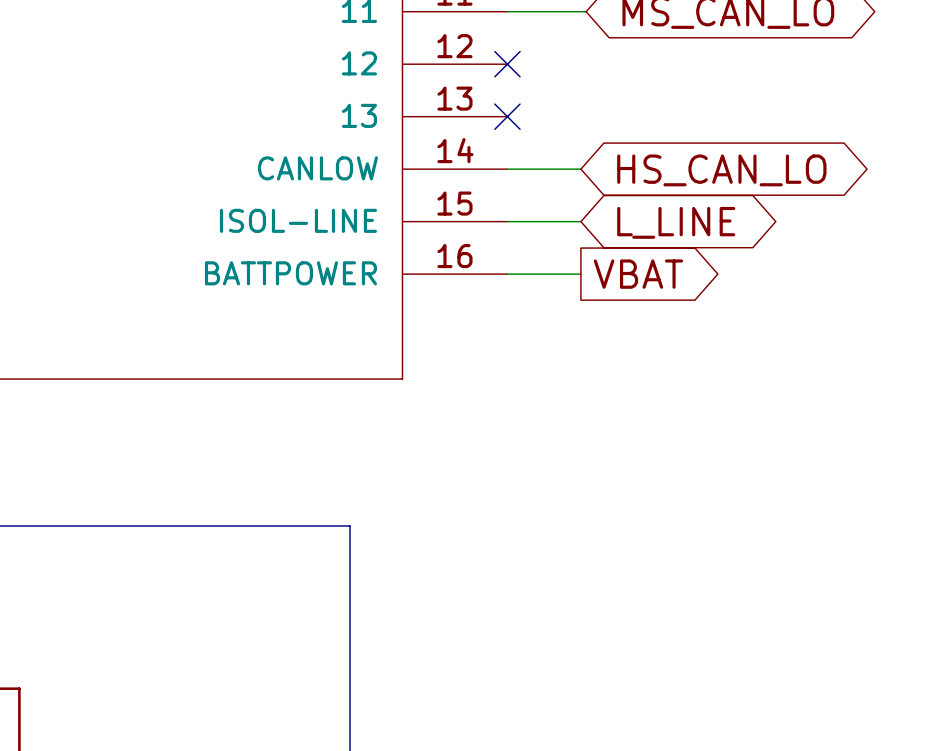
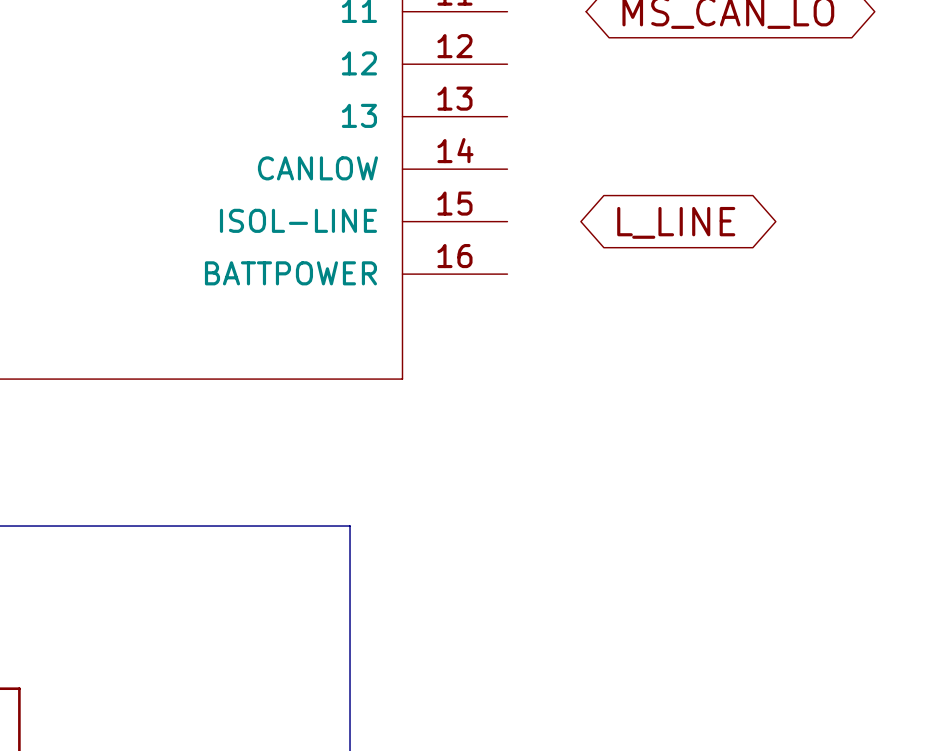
wire: (507, 11) (586, 11) -> none
no-connect mark: (507, 64) -> none
no-connect mark: (507, 116) -> none
wire: (507, 169) (580, 169) -> none
global label: HS_CAN_LO (721, 170) -> none
wire: (507, 221) (580, 221) -> none
wire: (507, 274) (580, 274) -> none
global label: VBAT (638, 274) -> none

